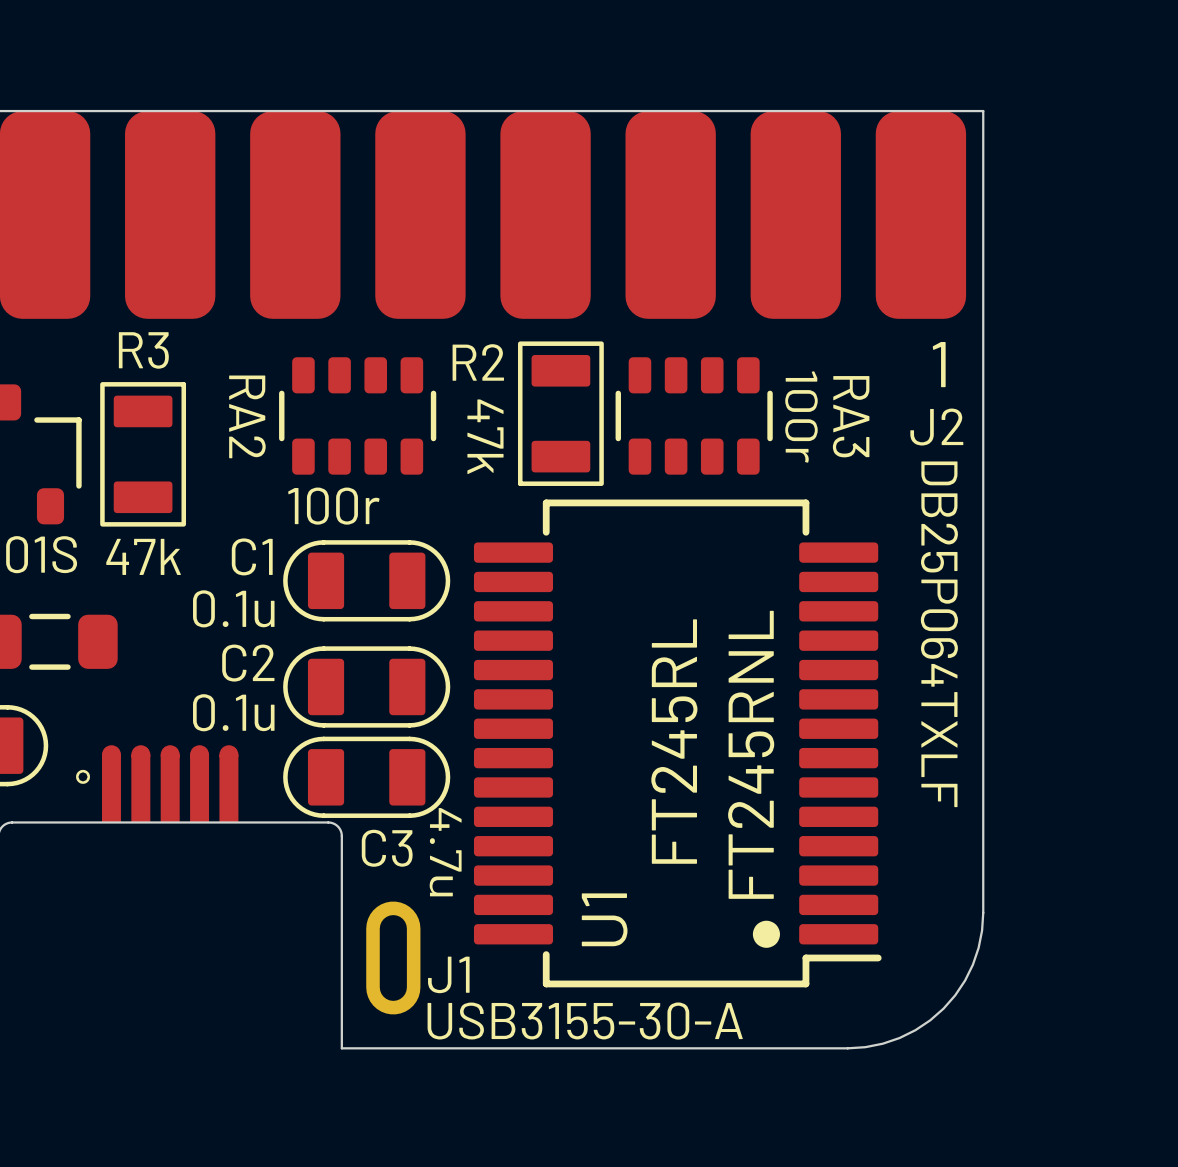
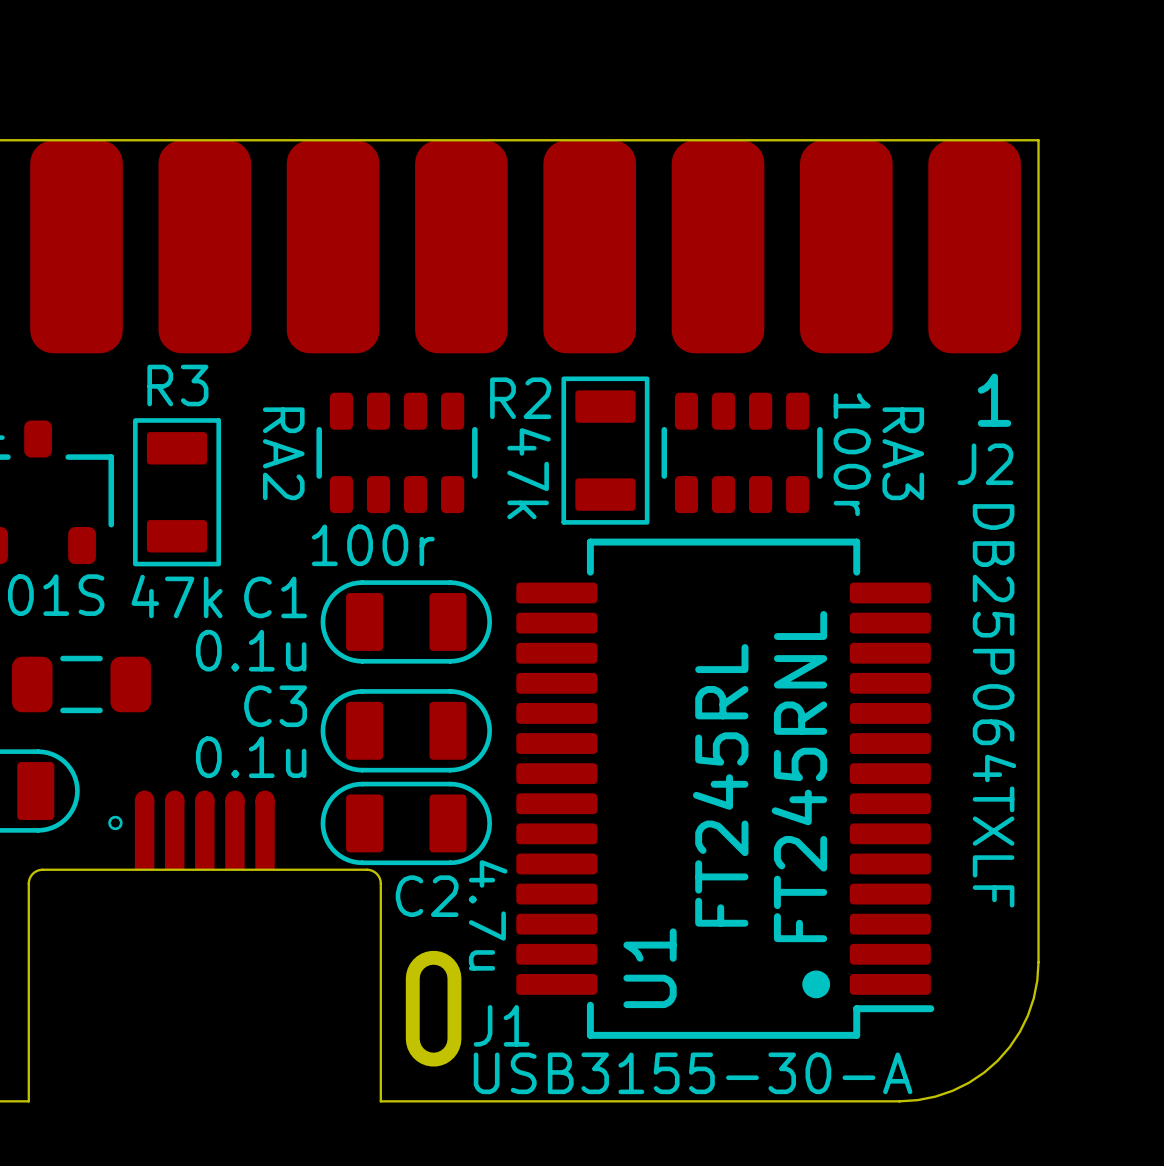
C2 name: C2 (248, 663) -> C3 (275, 706)
C3 name: C3 (387, 848) -> C2 (427, 896)

